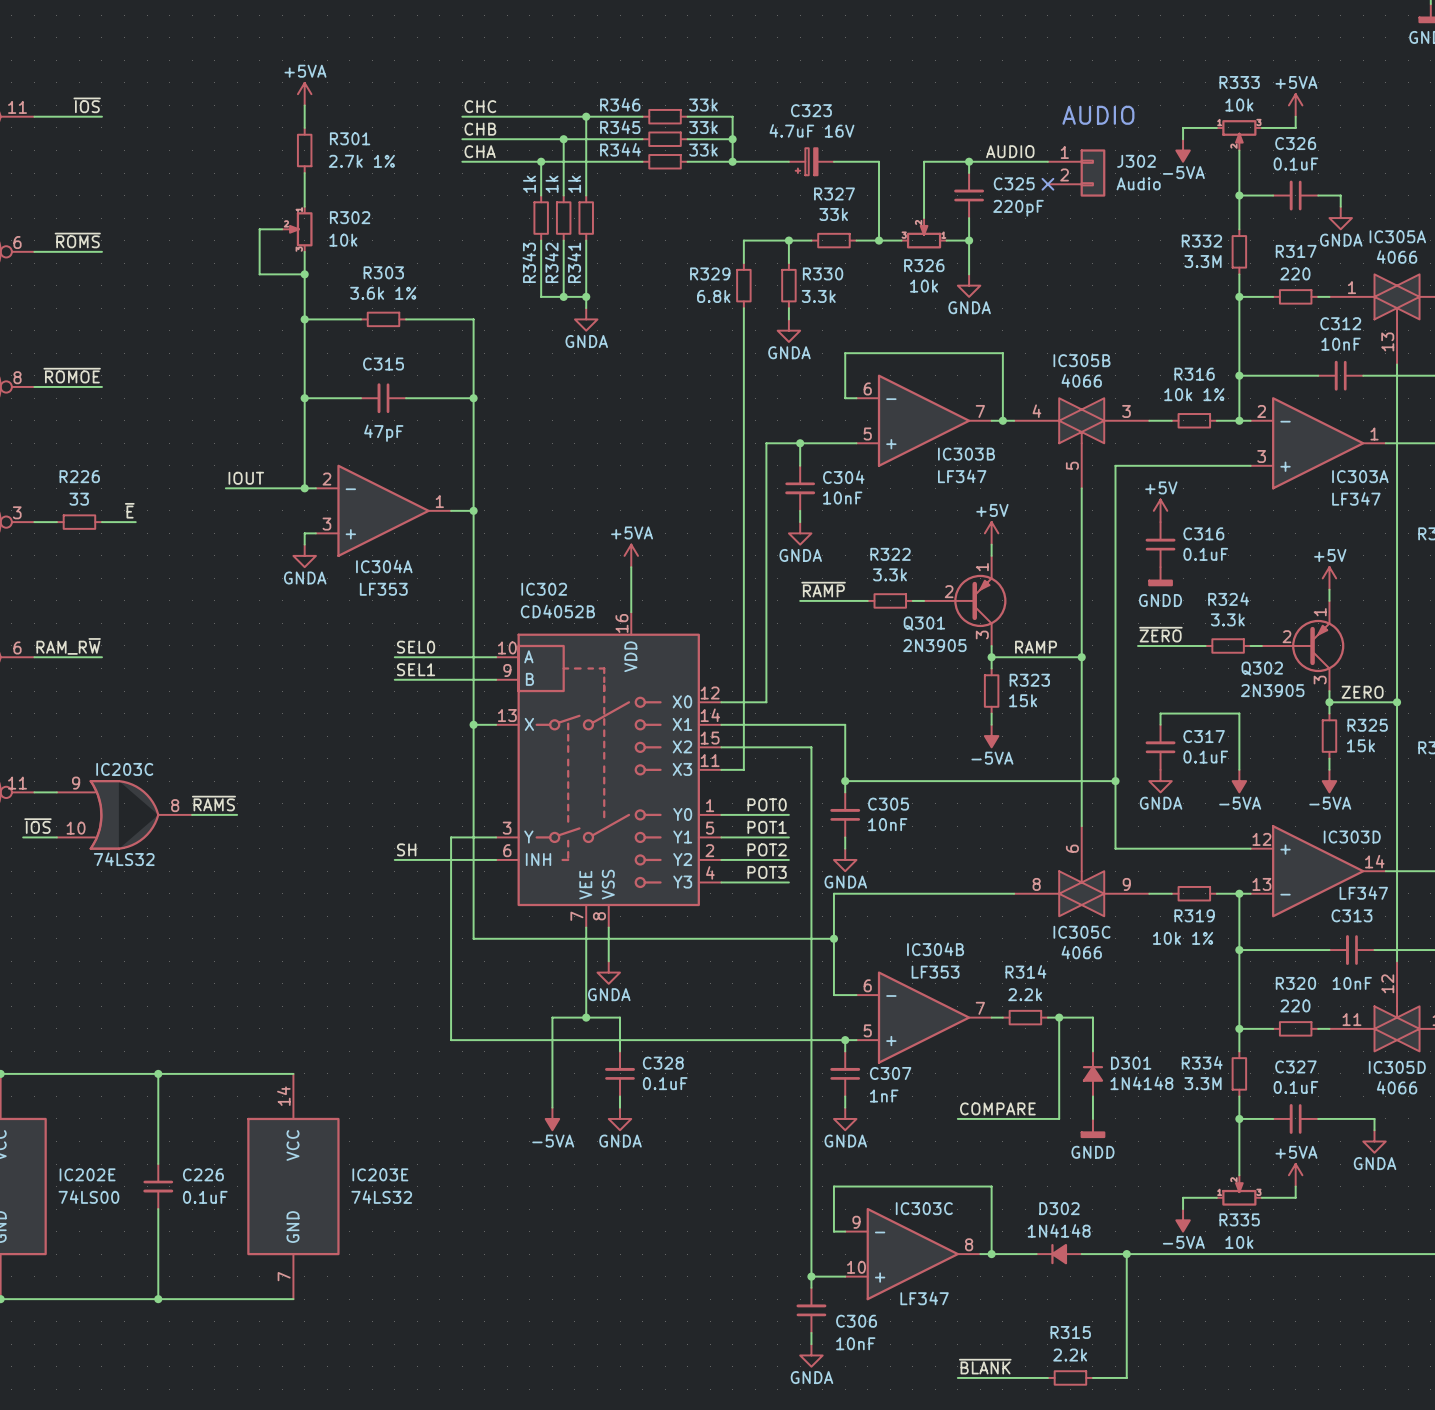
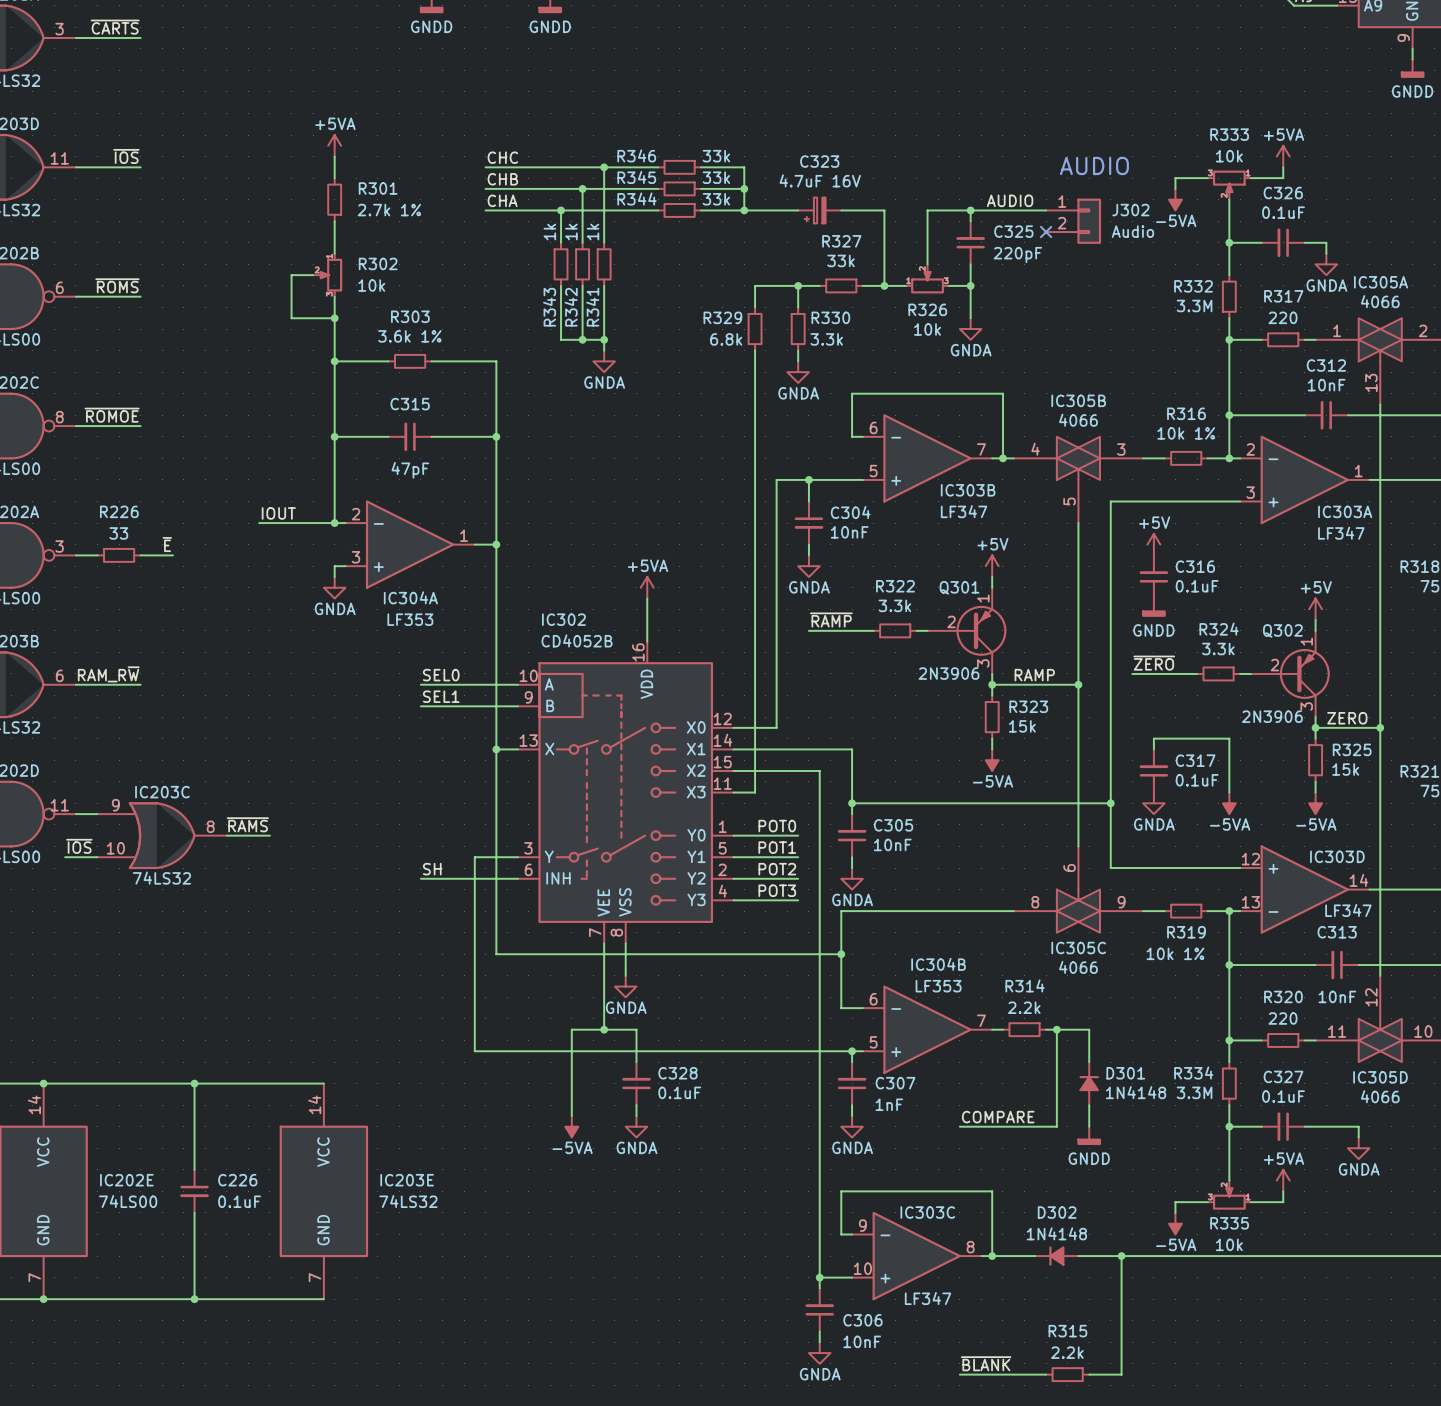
R333 flip: as is (1239, 131) -> left-right (1229, 181)
R326 flip: as is (924, 237) -> left-right (927, 282)
Q301 name position: Q301 (924, 623) -> Q301 (959, 587)
Q301 value: 2N3905 (934, 645) -> 2N3906 (949, 673)
Q302 name position: Q302 (1262, 668) -> Q302 (1282, 630)
Q302 value: 2N3905 (1272, 690) -> 2N3906 (1272, 716)
R335 flip: as is (1239, 1194) -> left-right (1229, 1198)

